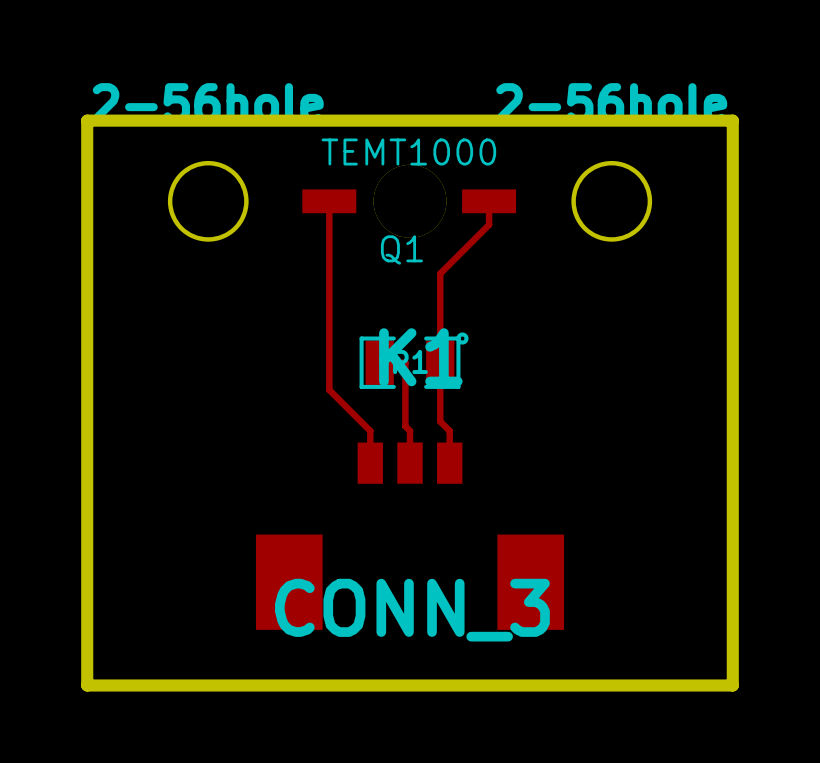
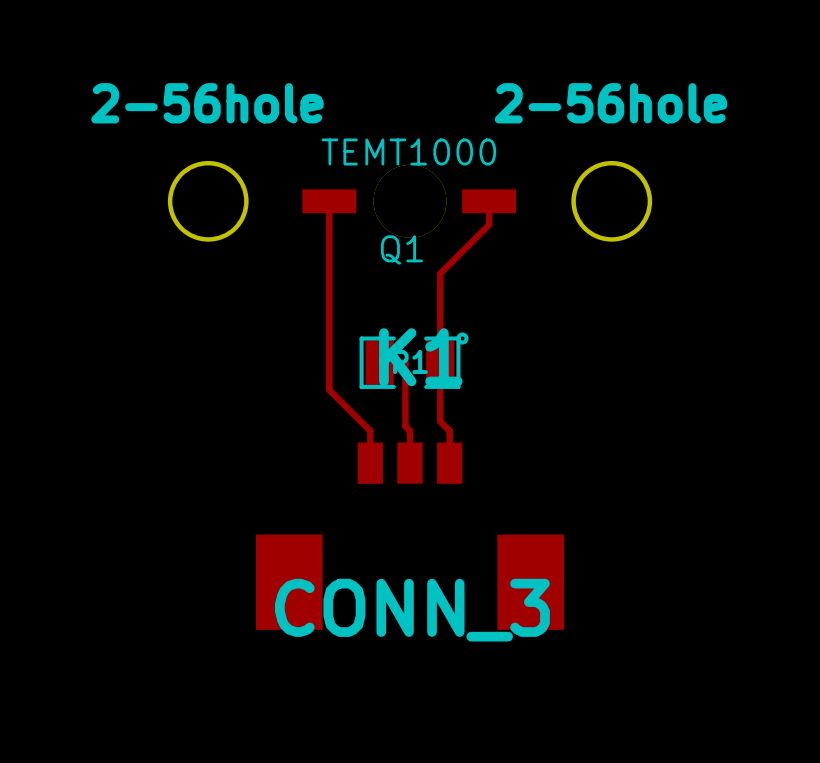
board edge: (87, 120) (732, 120) (732, 685) (87, 685) (87, 120) -> none

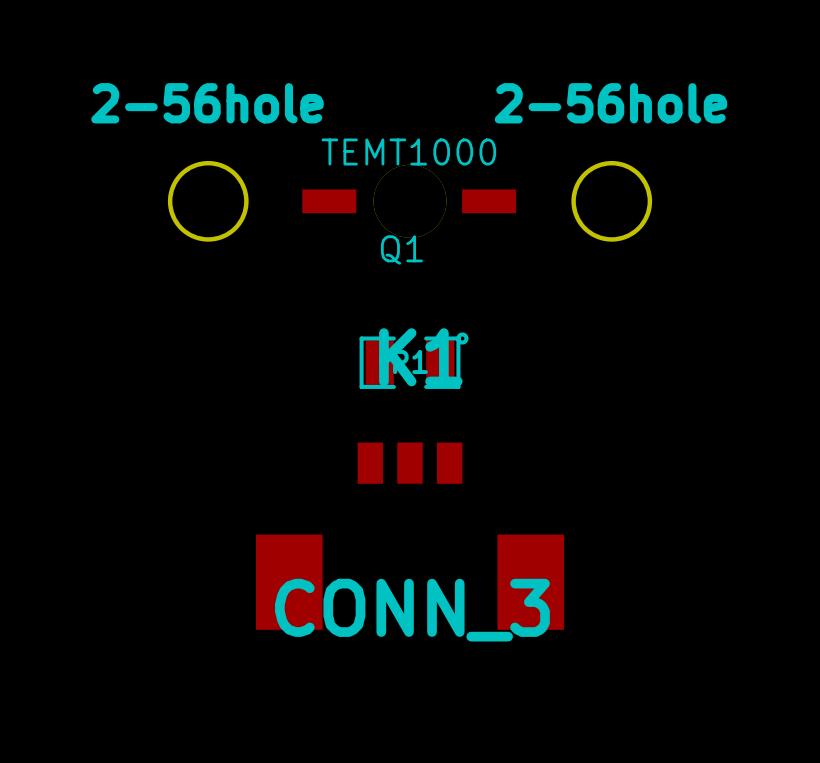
track: (329, 201) (329, 389) (370, 430) (370, 463) -> none
track: (489, 201) (489, 224) (440, 273) (440, 421) (449, 430) (449, 463) -> none
track: (379, 362) (405, 362) (405, 426) (410, 430) (410, 463) -> none

